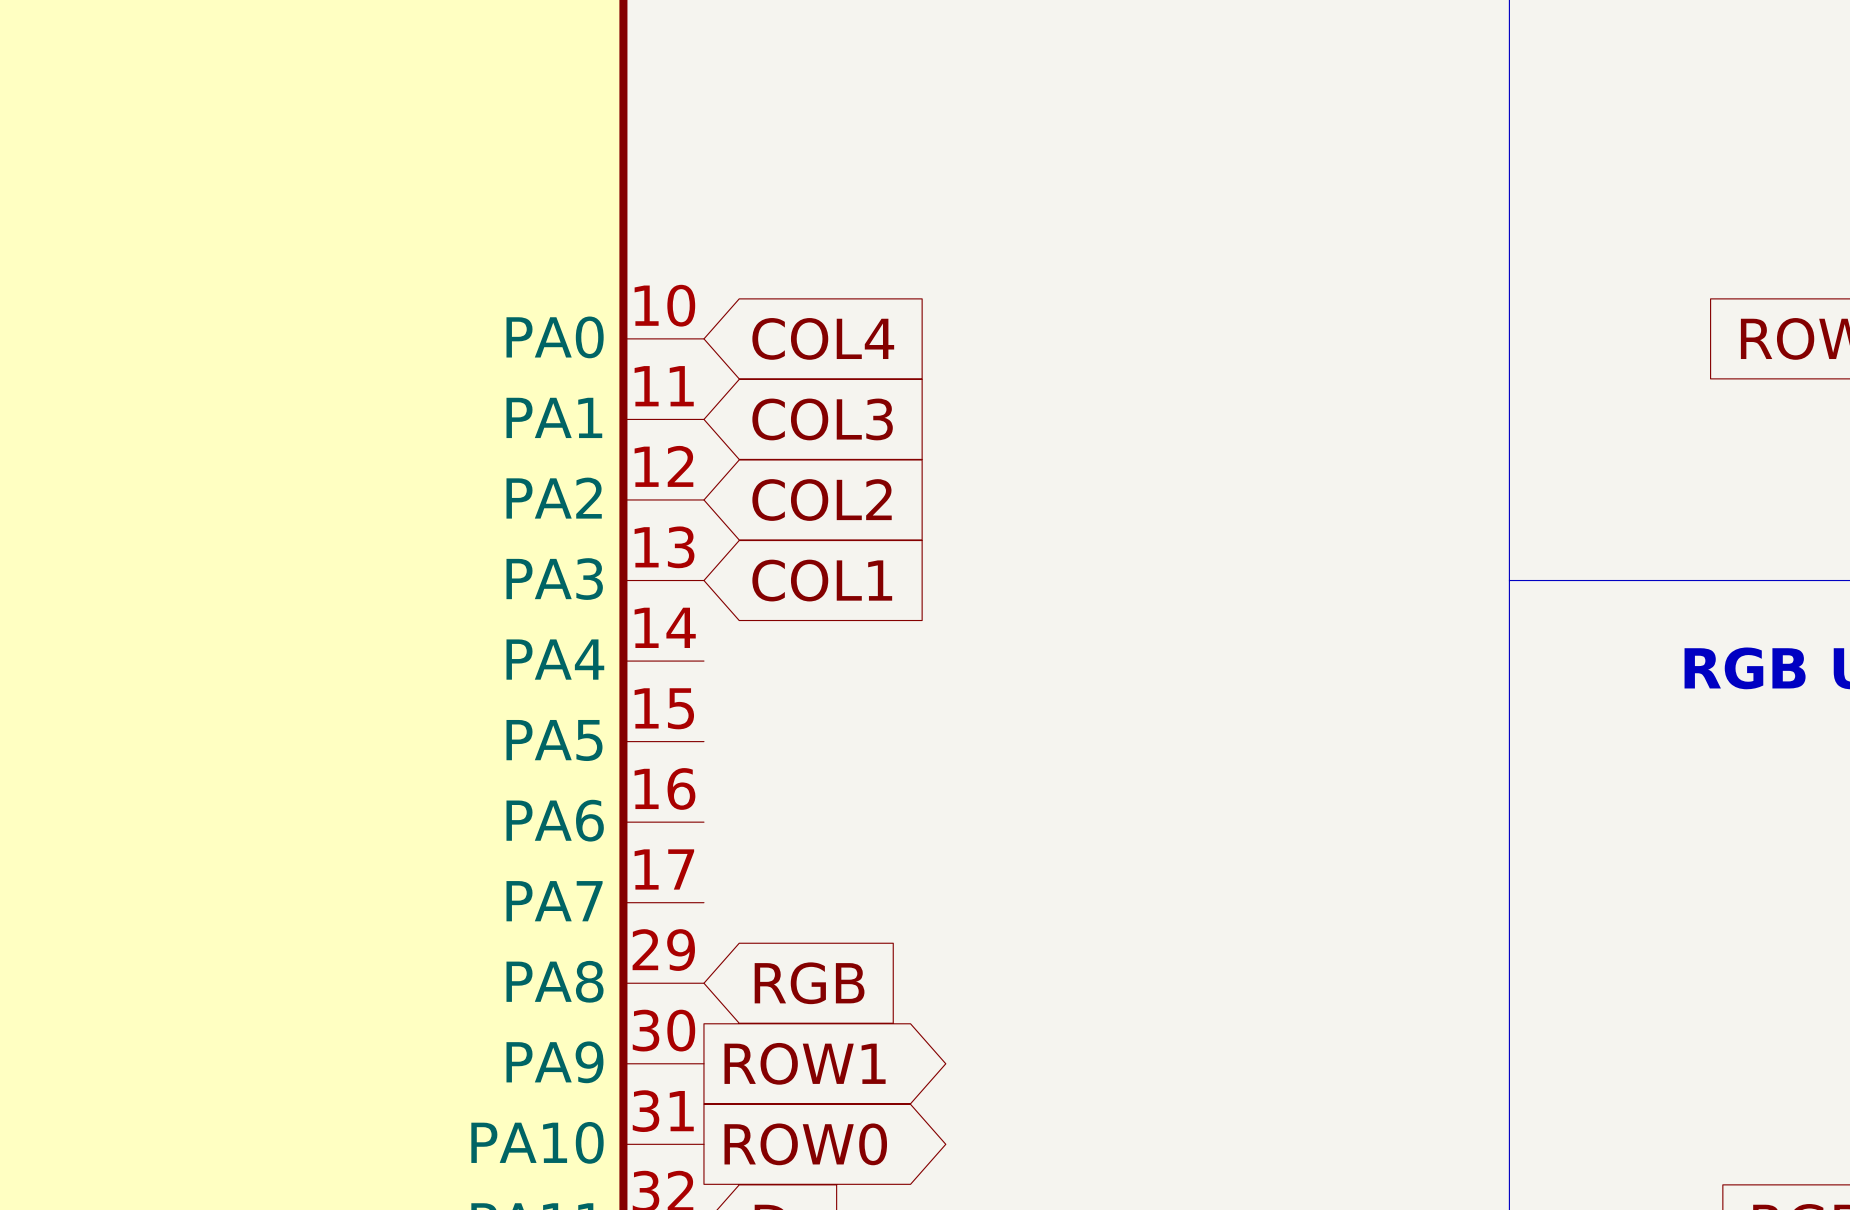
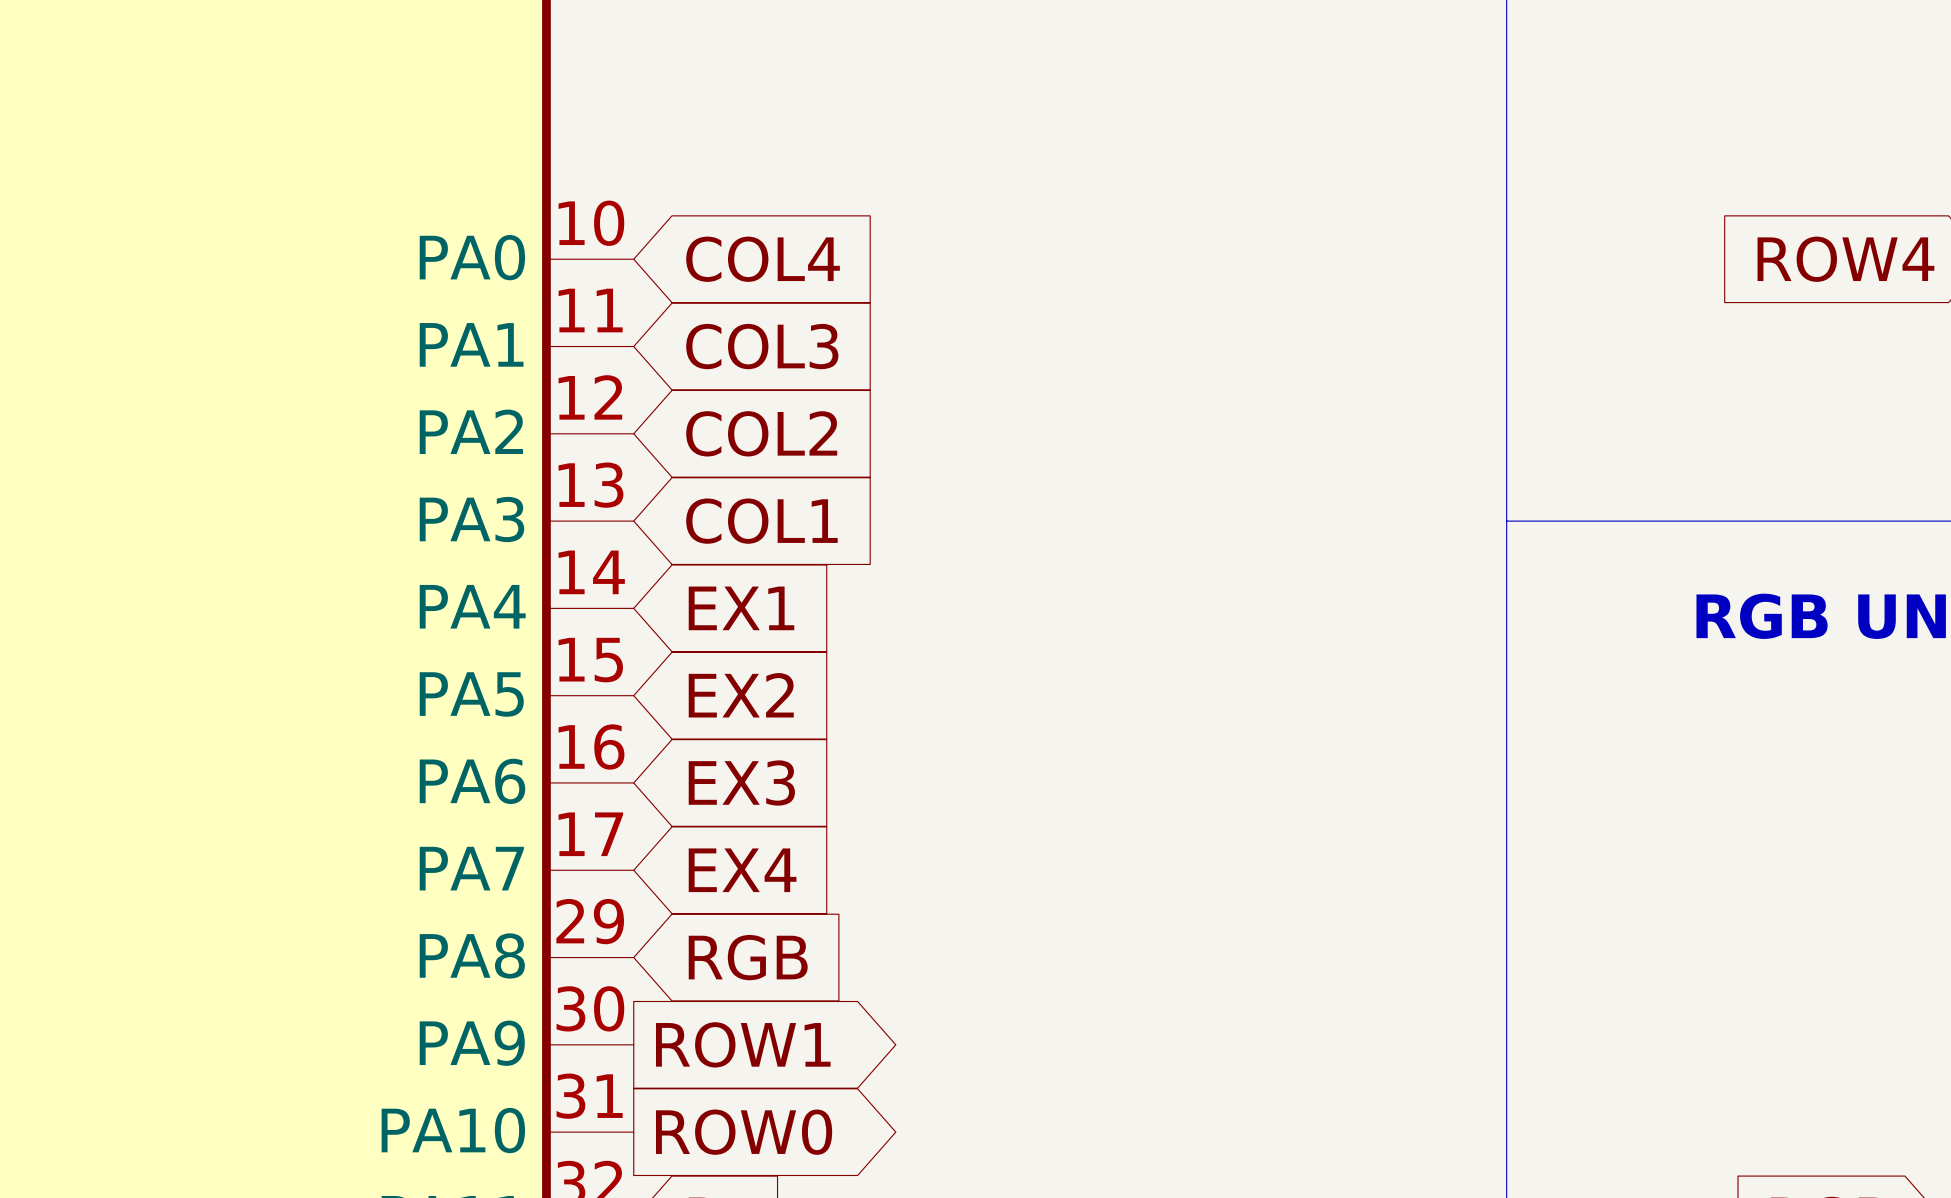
global label: none -> EX1 (741, 608)
global label: none -> EX2 (741, 695)
global label: none -> EX3 (741, 783)
global label: none -> EX4 (742, 870)

